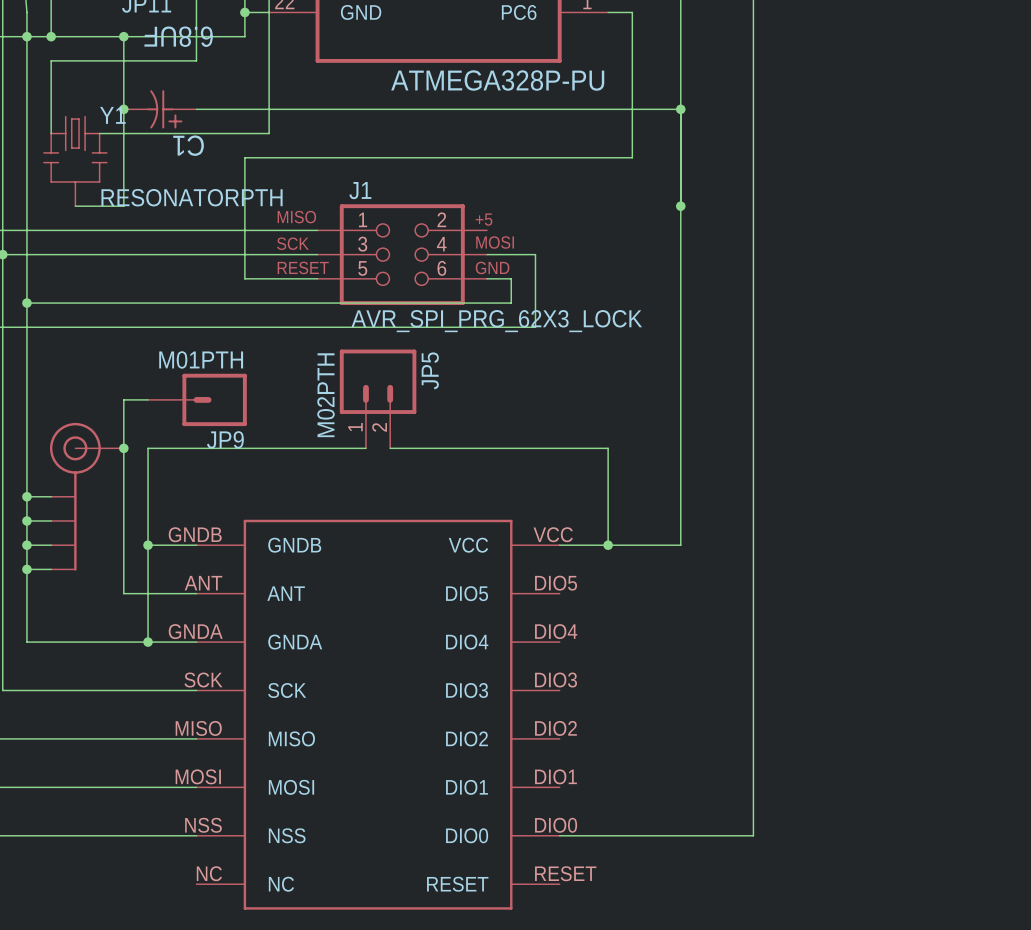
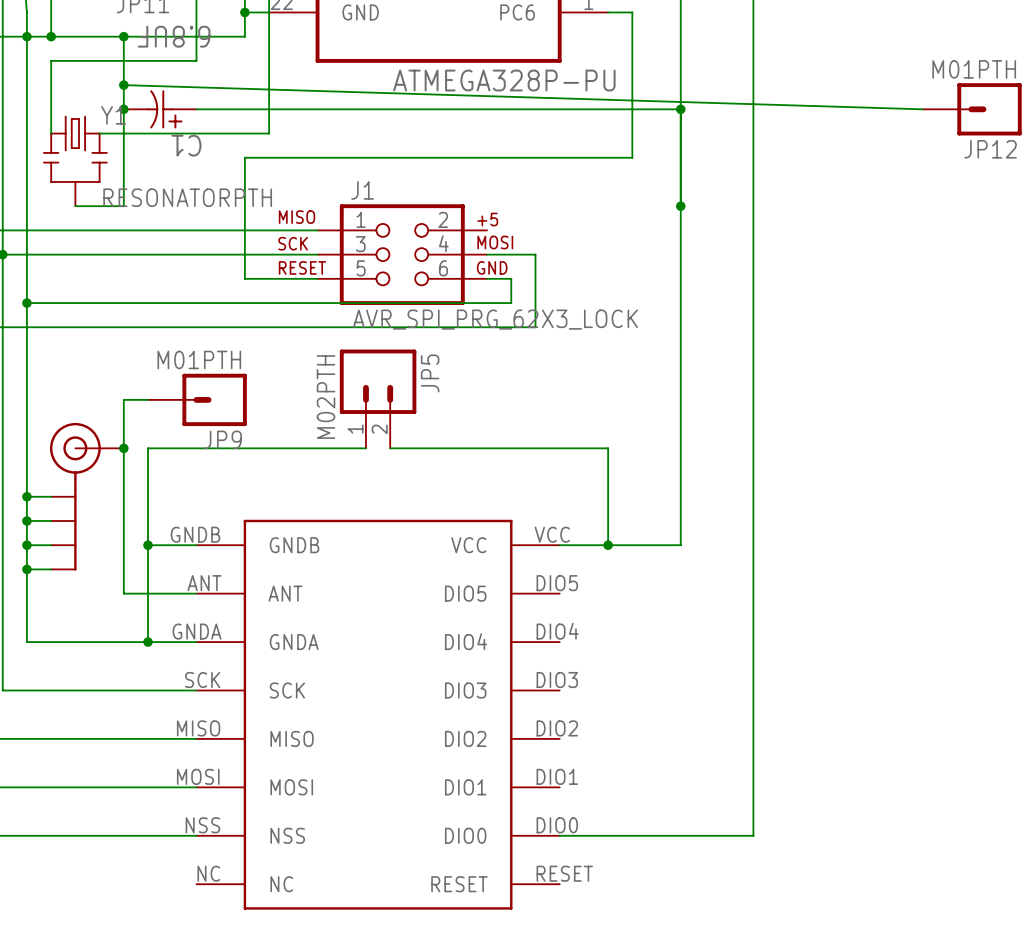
wire: none -> (123, 85) (922, 109)
junction: none -> (123, 85)
JP12: none -> M01PTH (972, 109)

